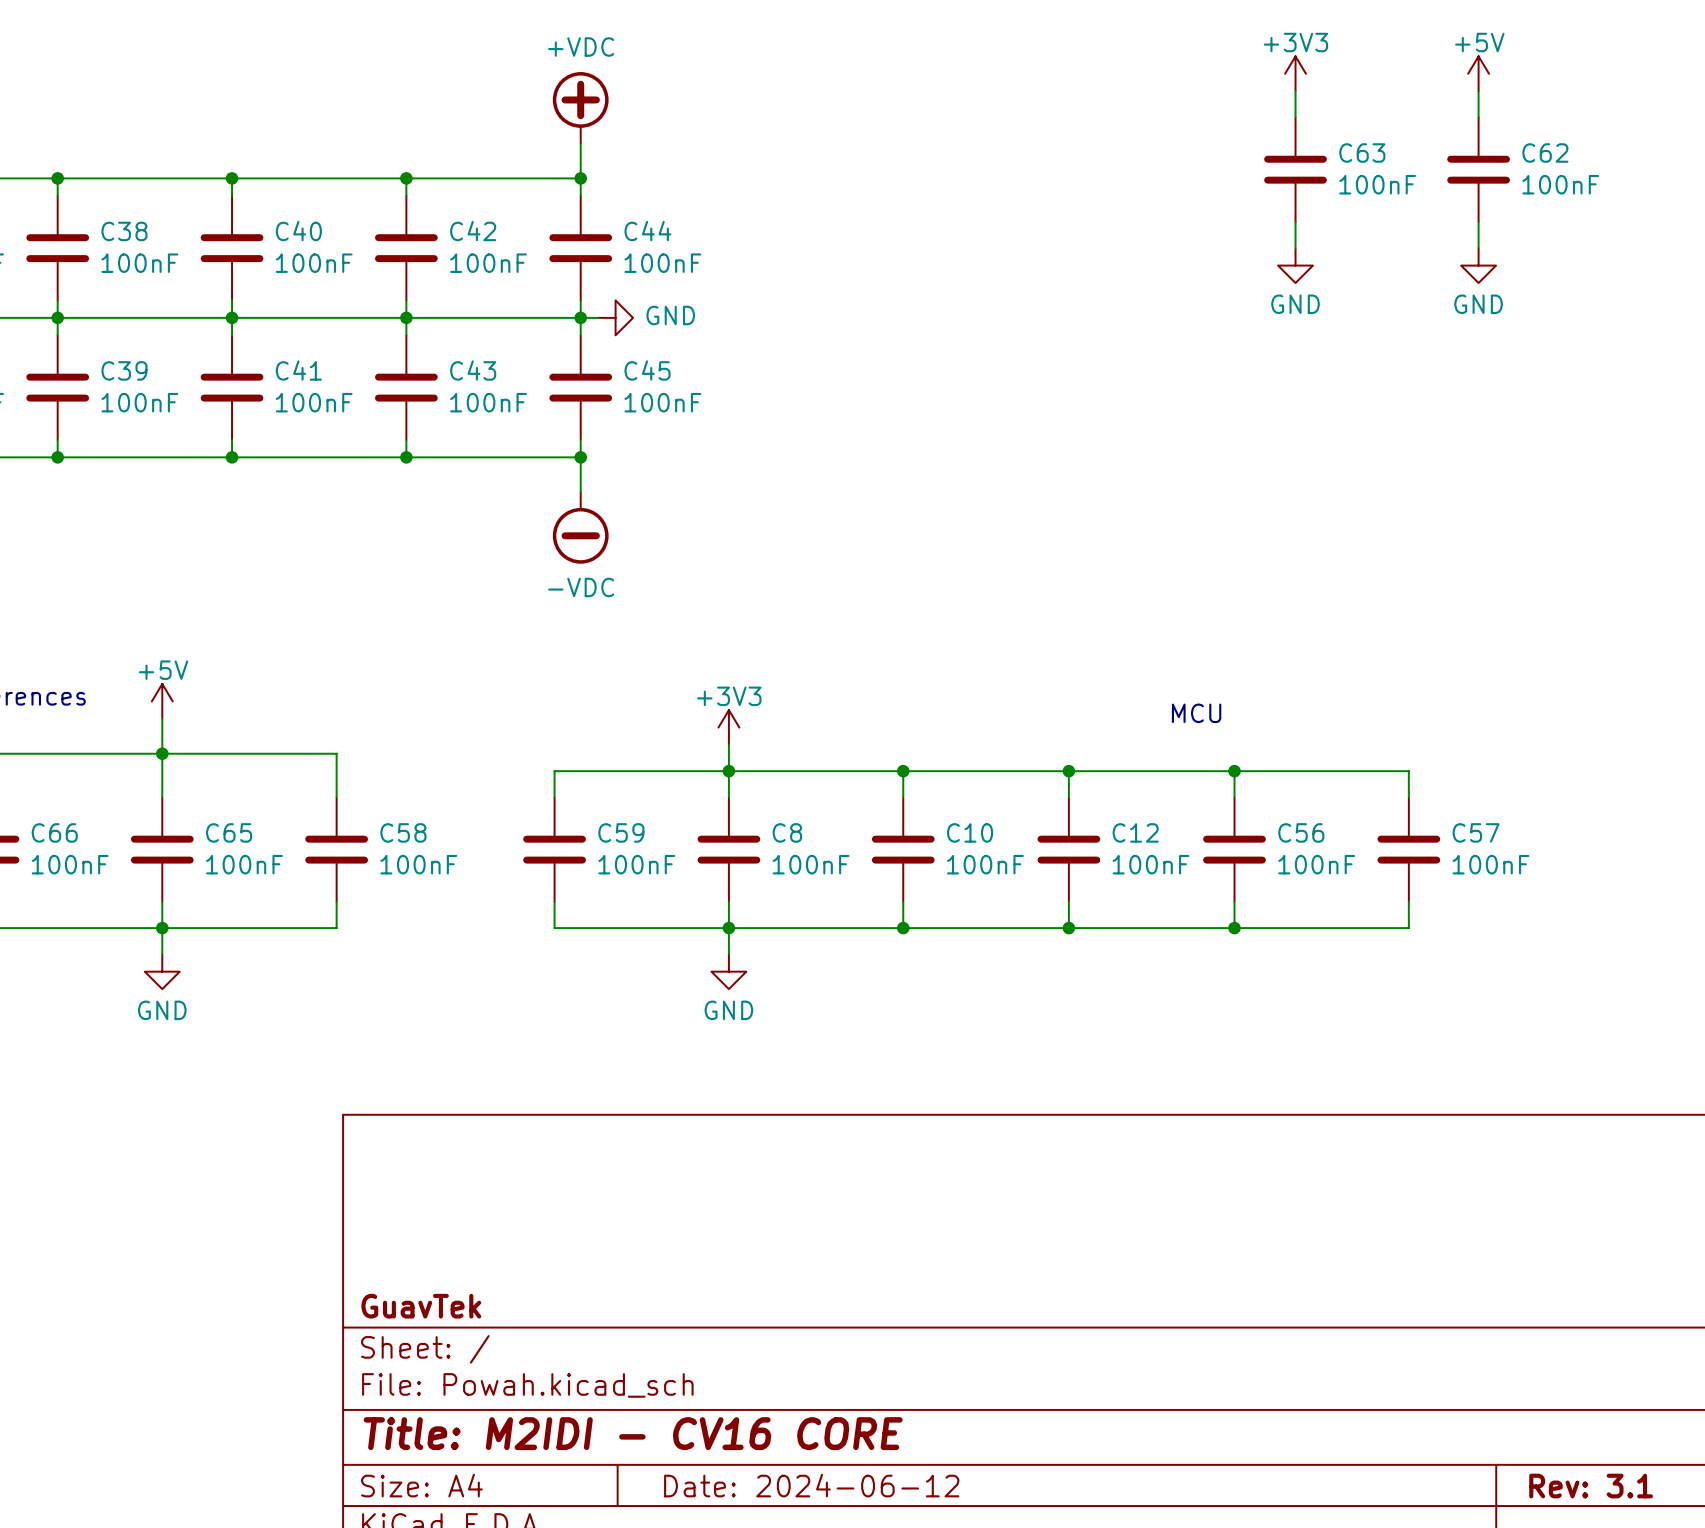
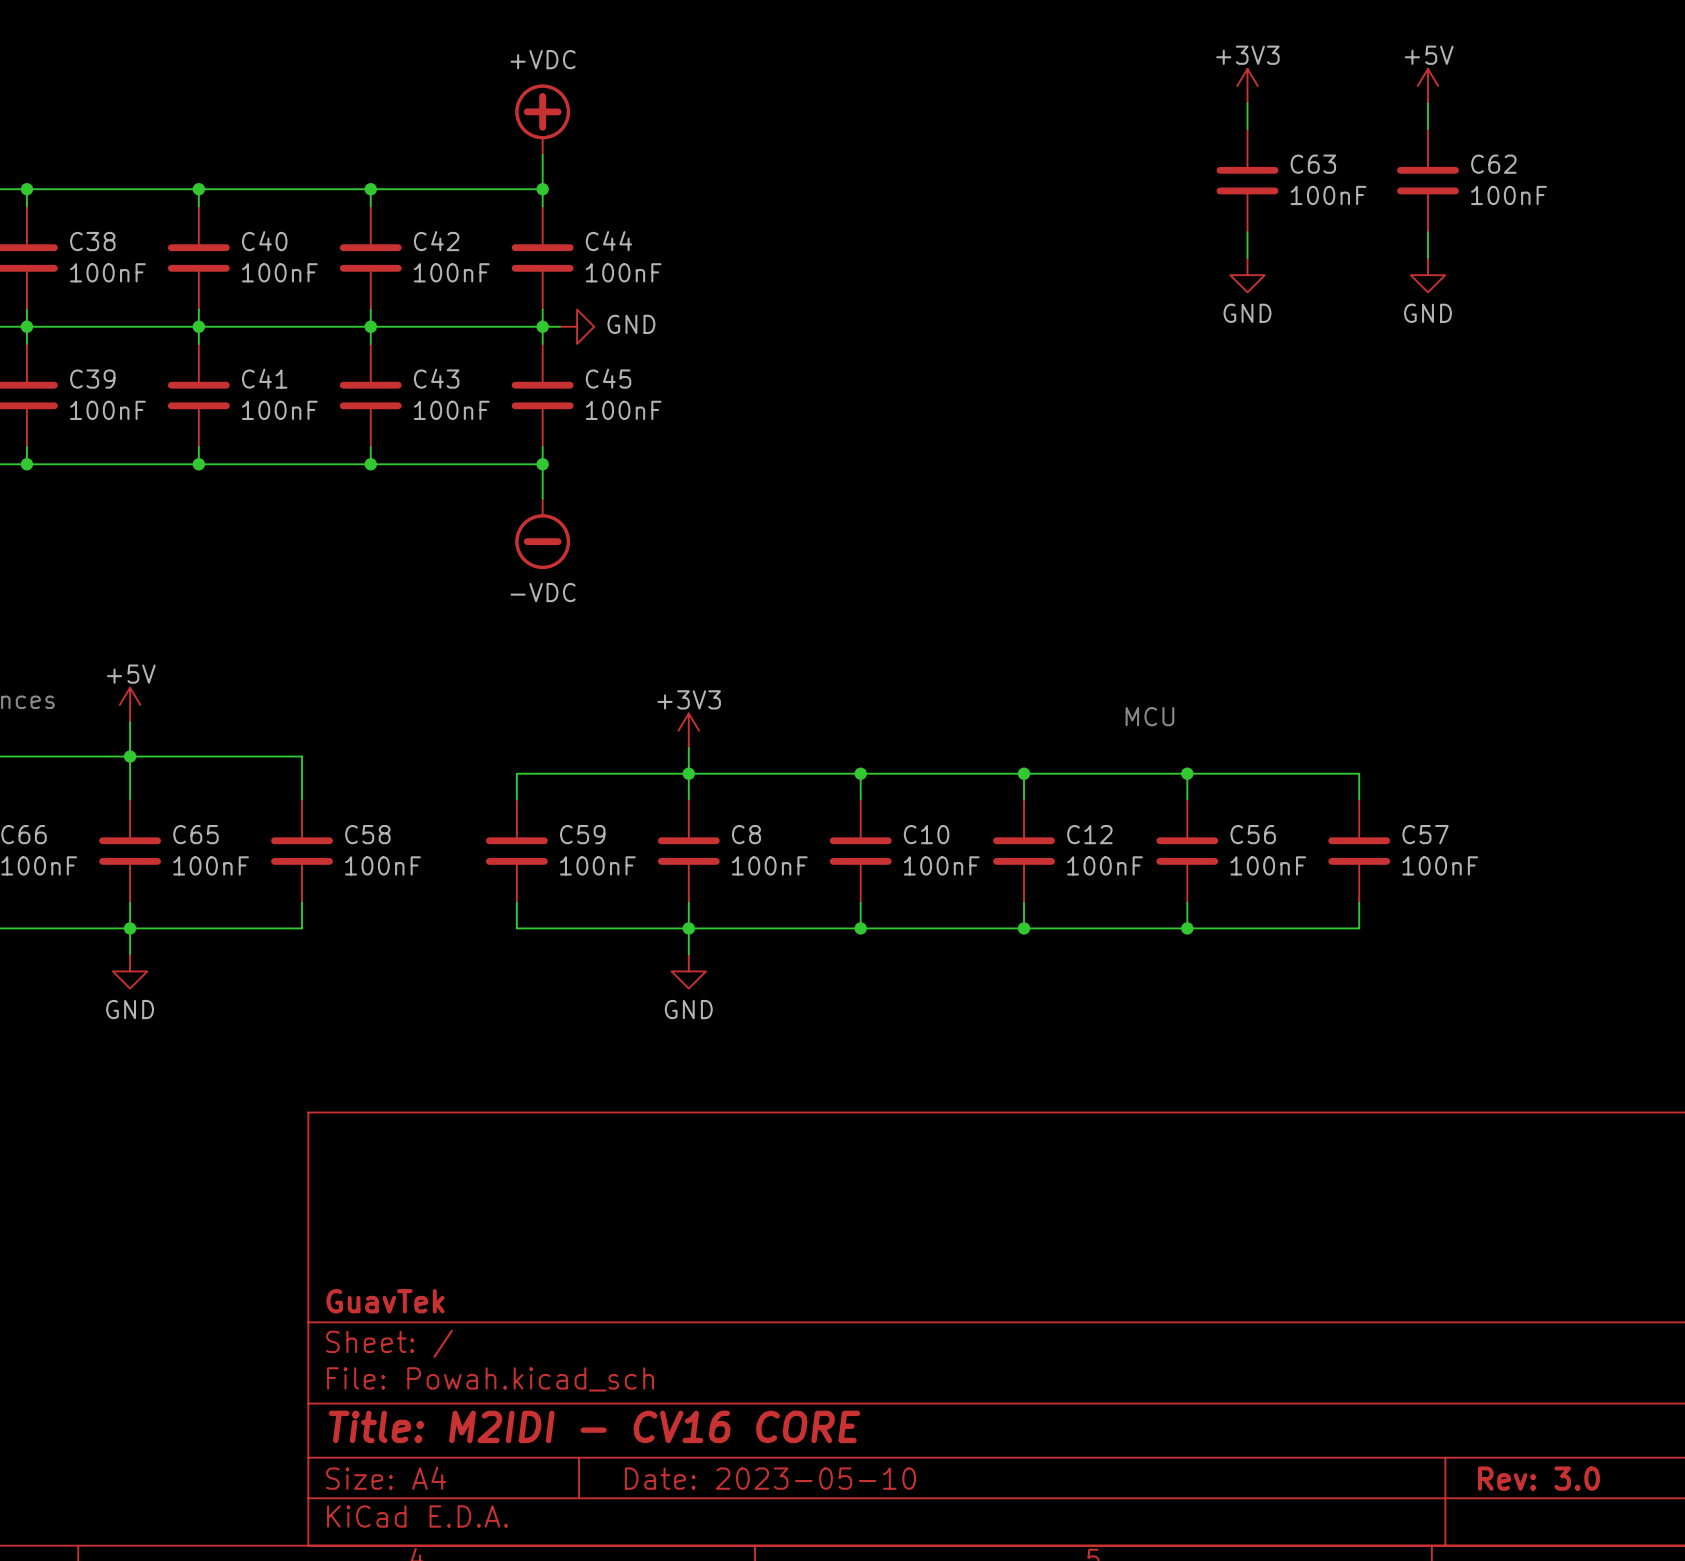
title block: Date: 2024-06-12 (811, 1485) -> Date: 2023-05-10 (770, 1478)
title block: Rev: 3.1 (1591, 1486) -> Rev: 3.0 (1538, 1478)

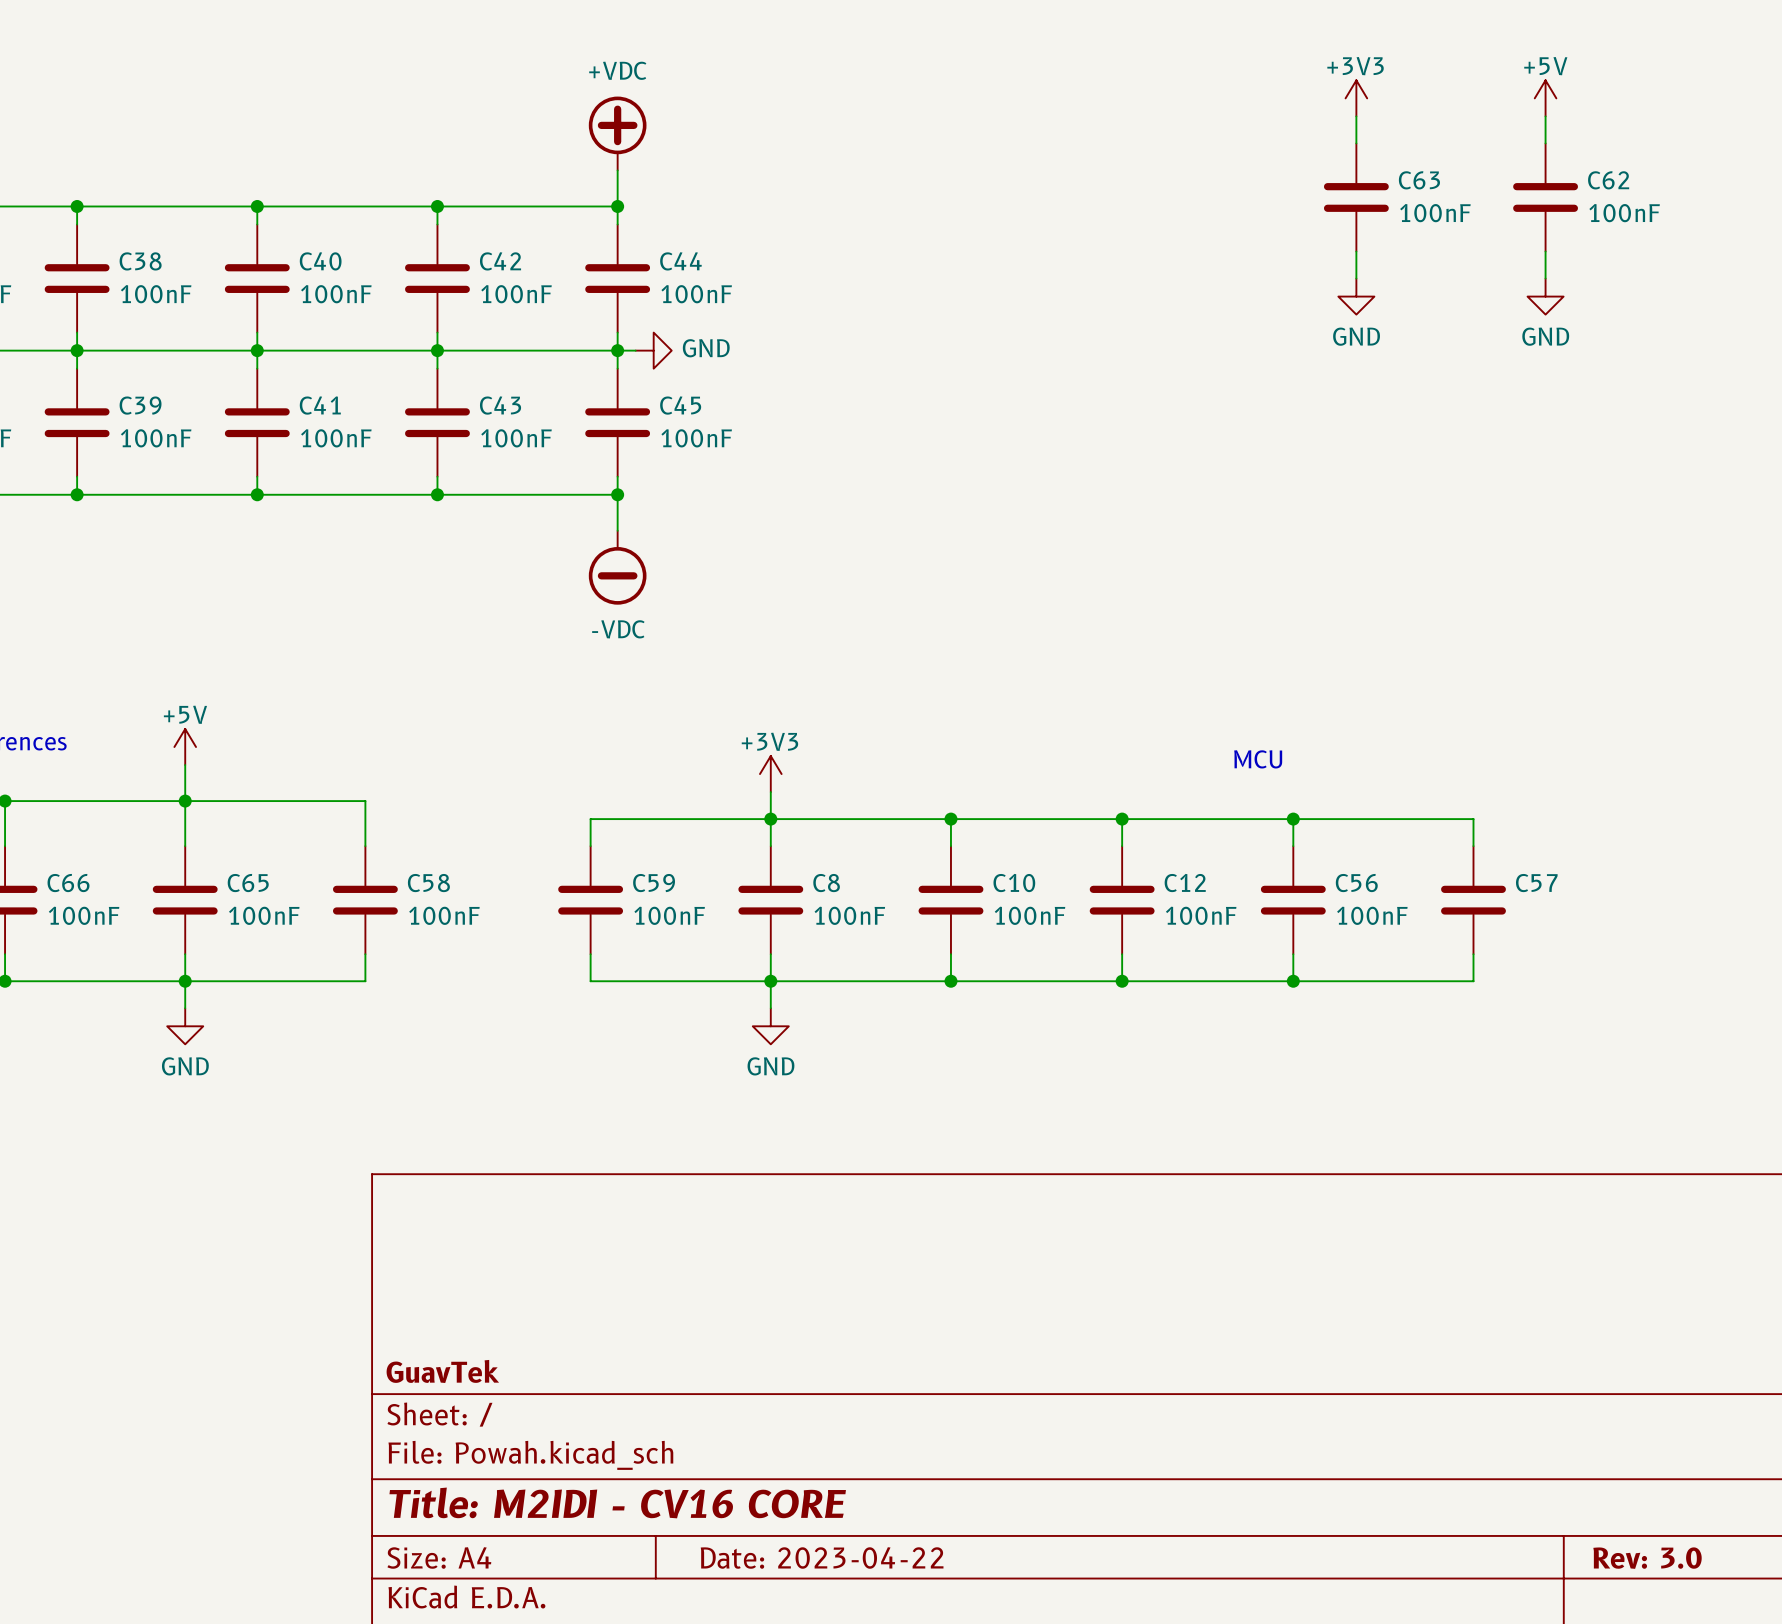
C57 value: 100nF (1440, 865) -> none
title block: Date: 2023-05-10 (770, 1478) -> Date: 2023-04-22 (822, 1557)

